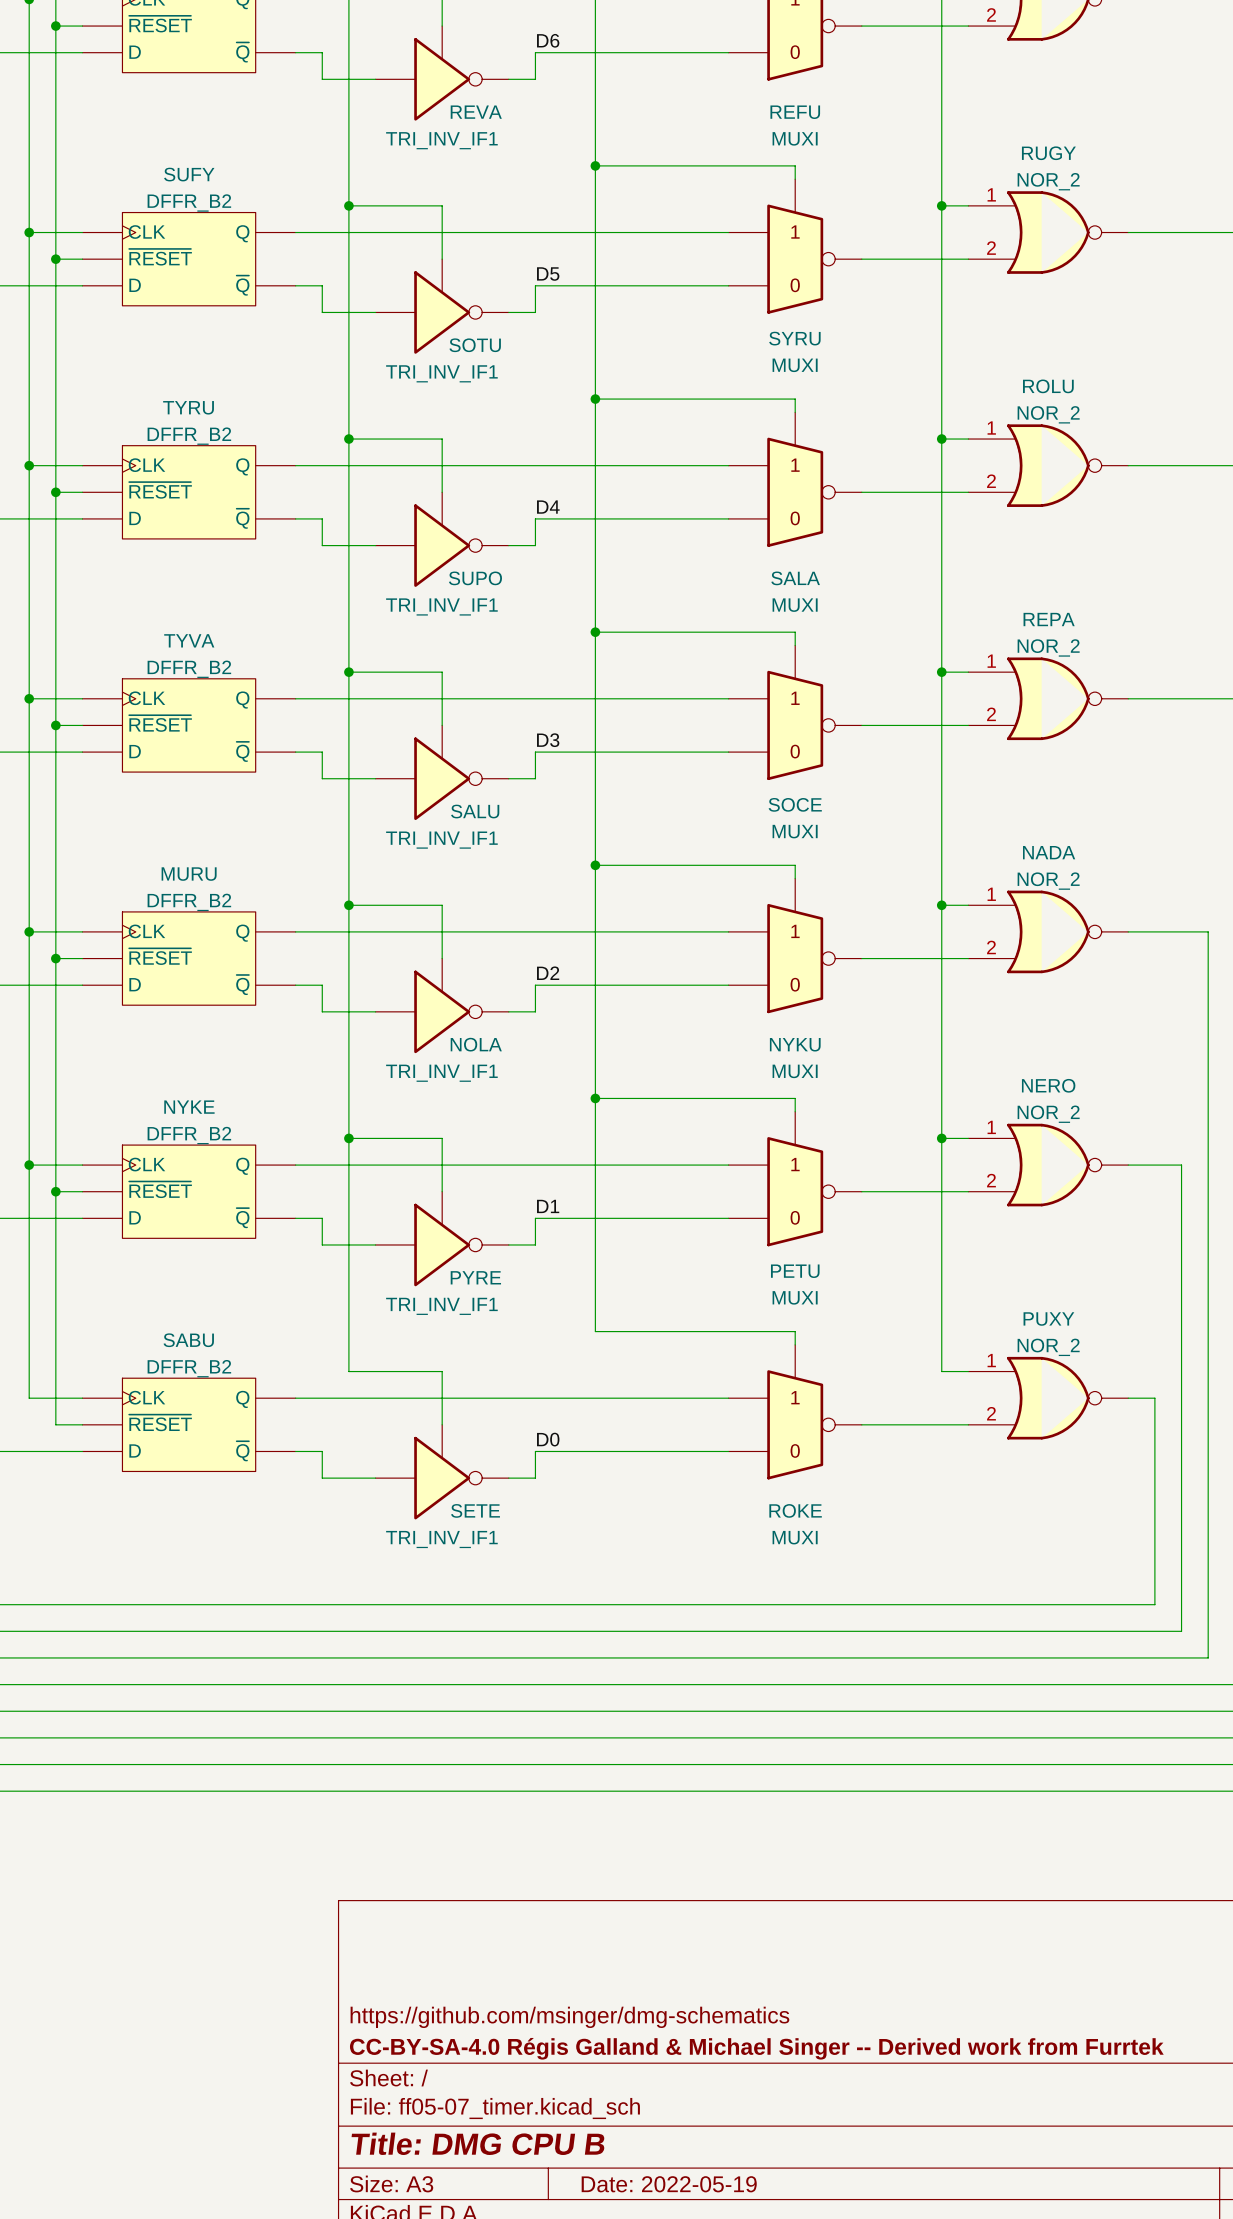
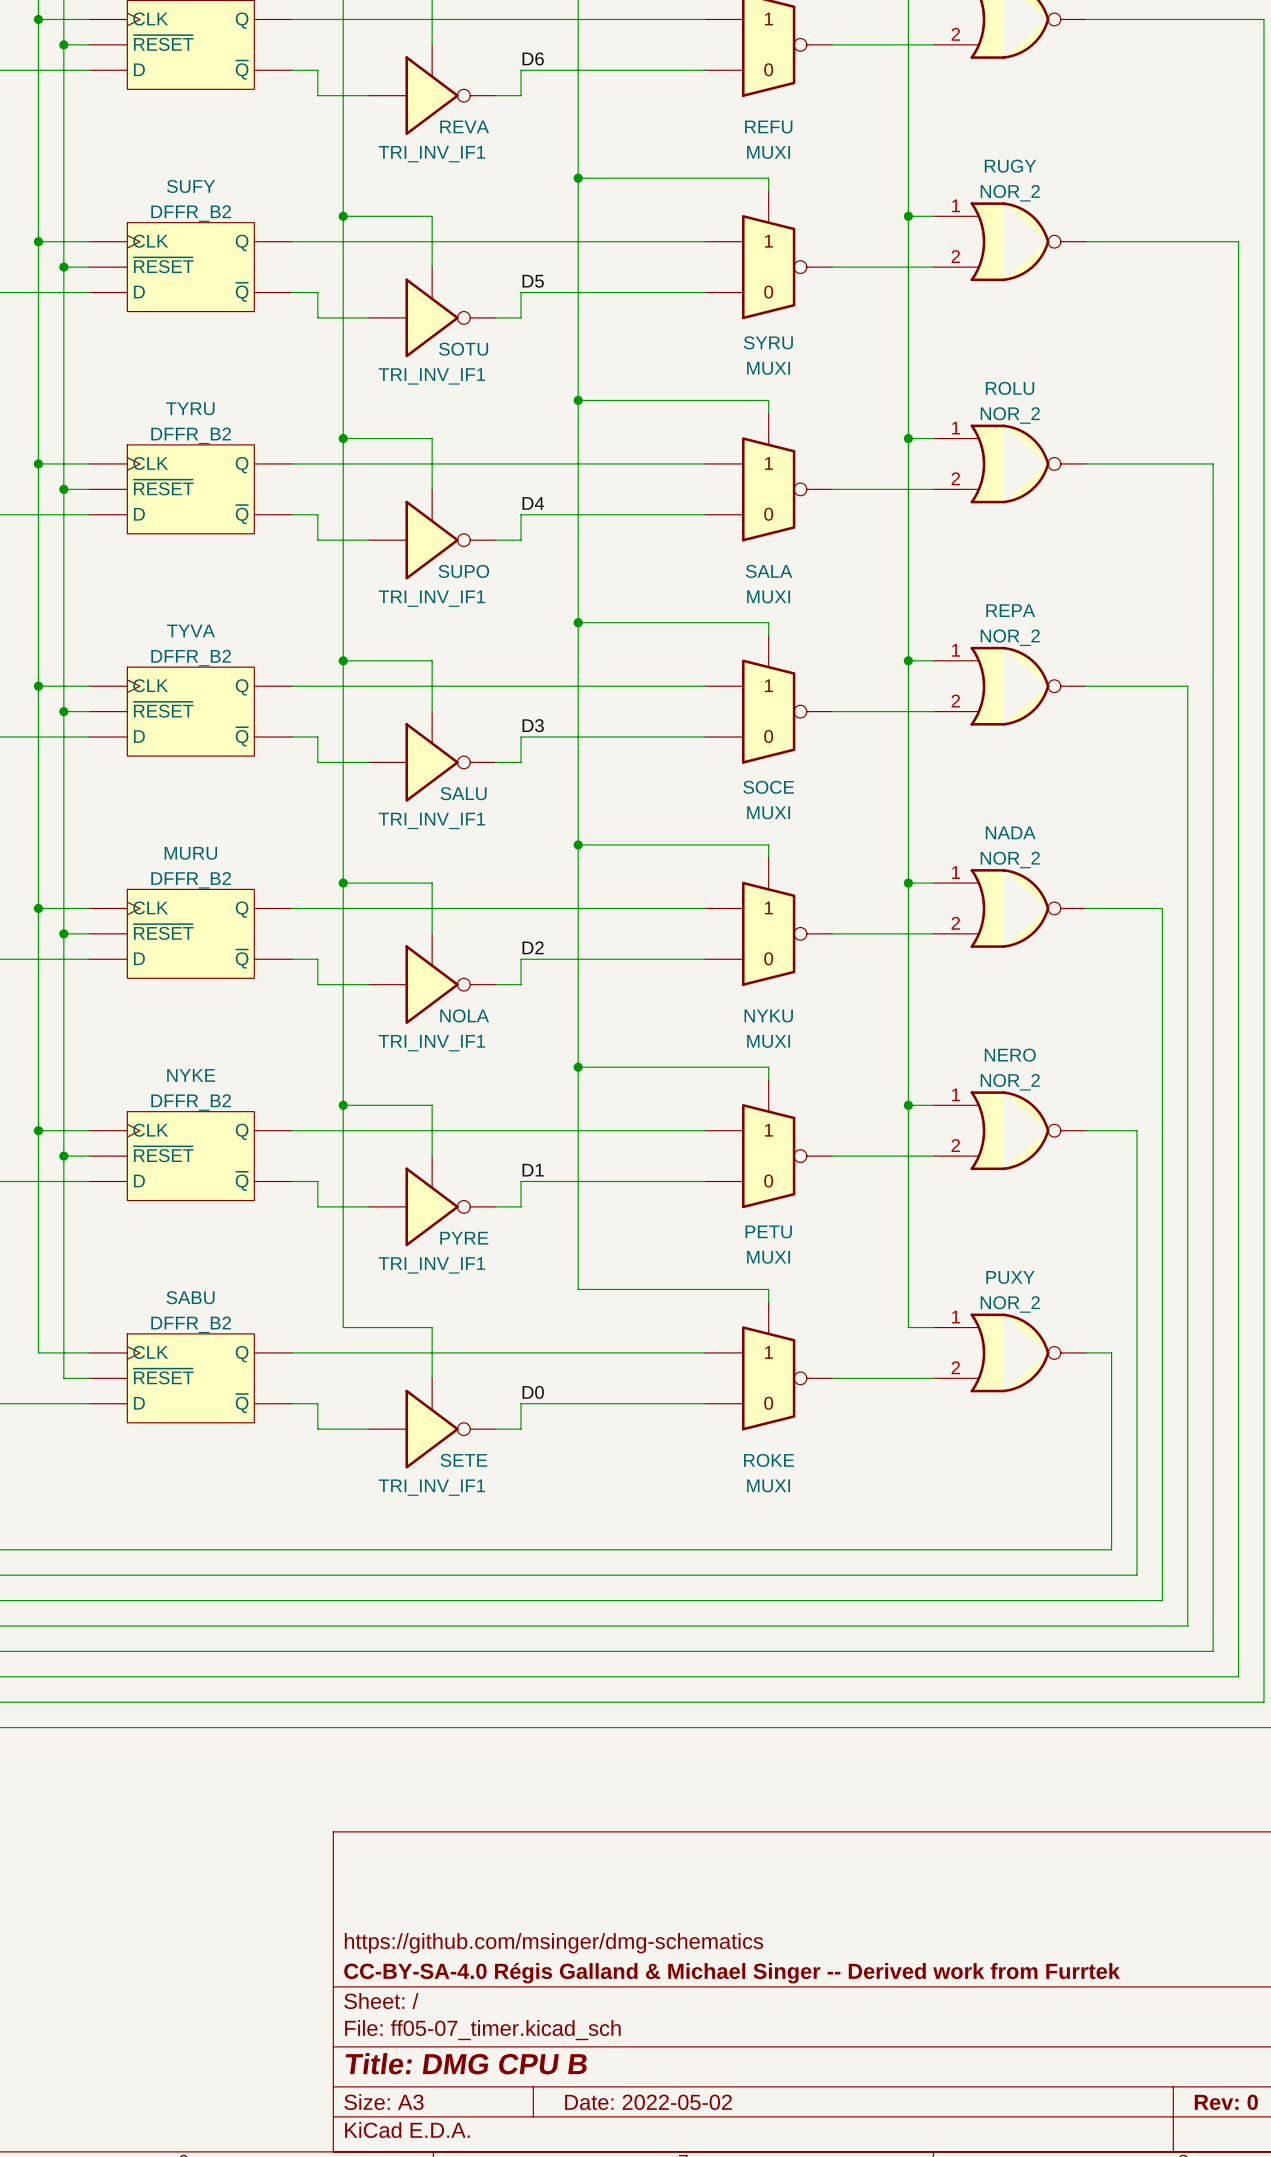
title block: Date: 2022-05-19 (669, 2184) -> Date: 2022-05-02 (648, 2102)

